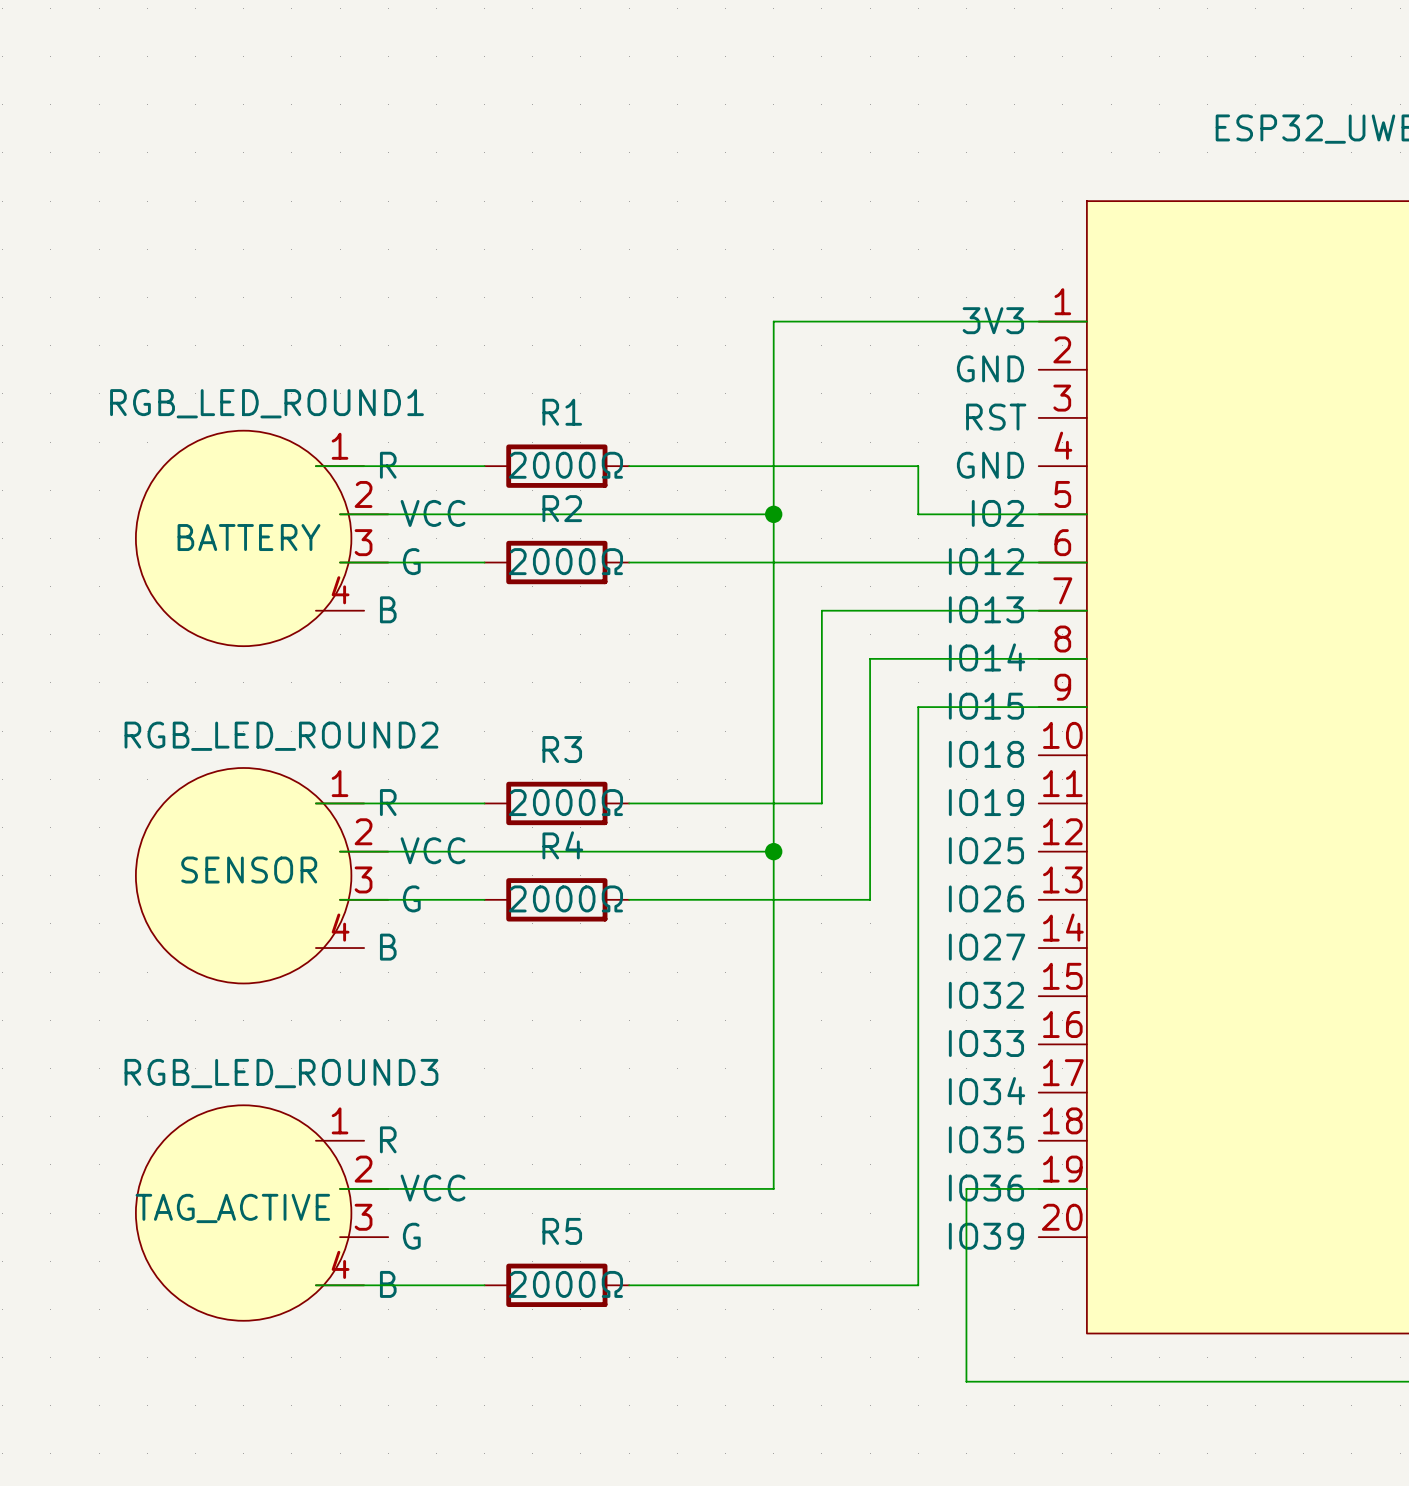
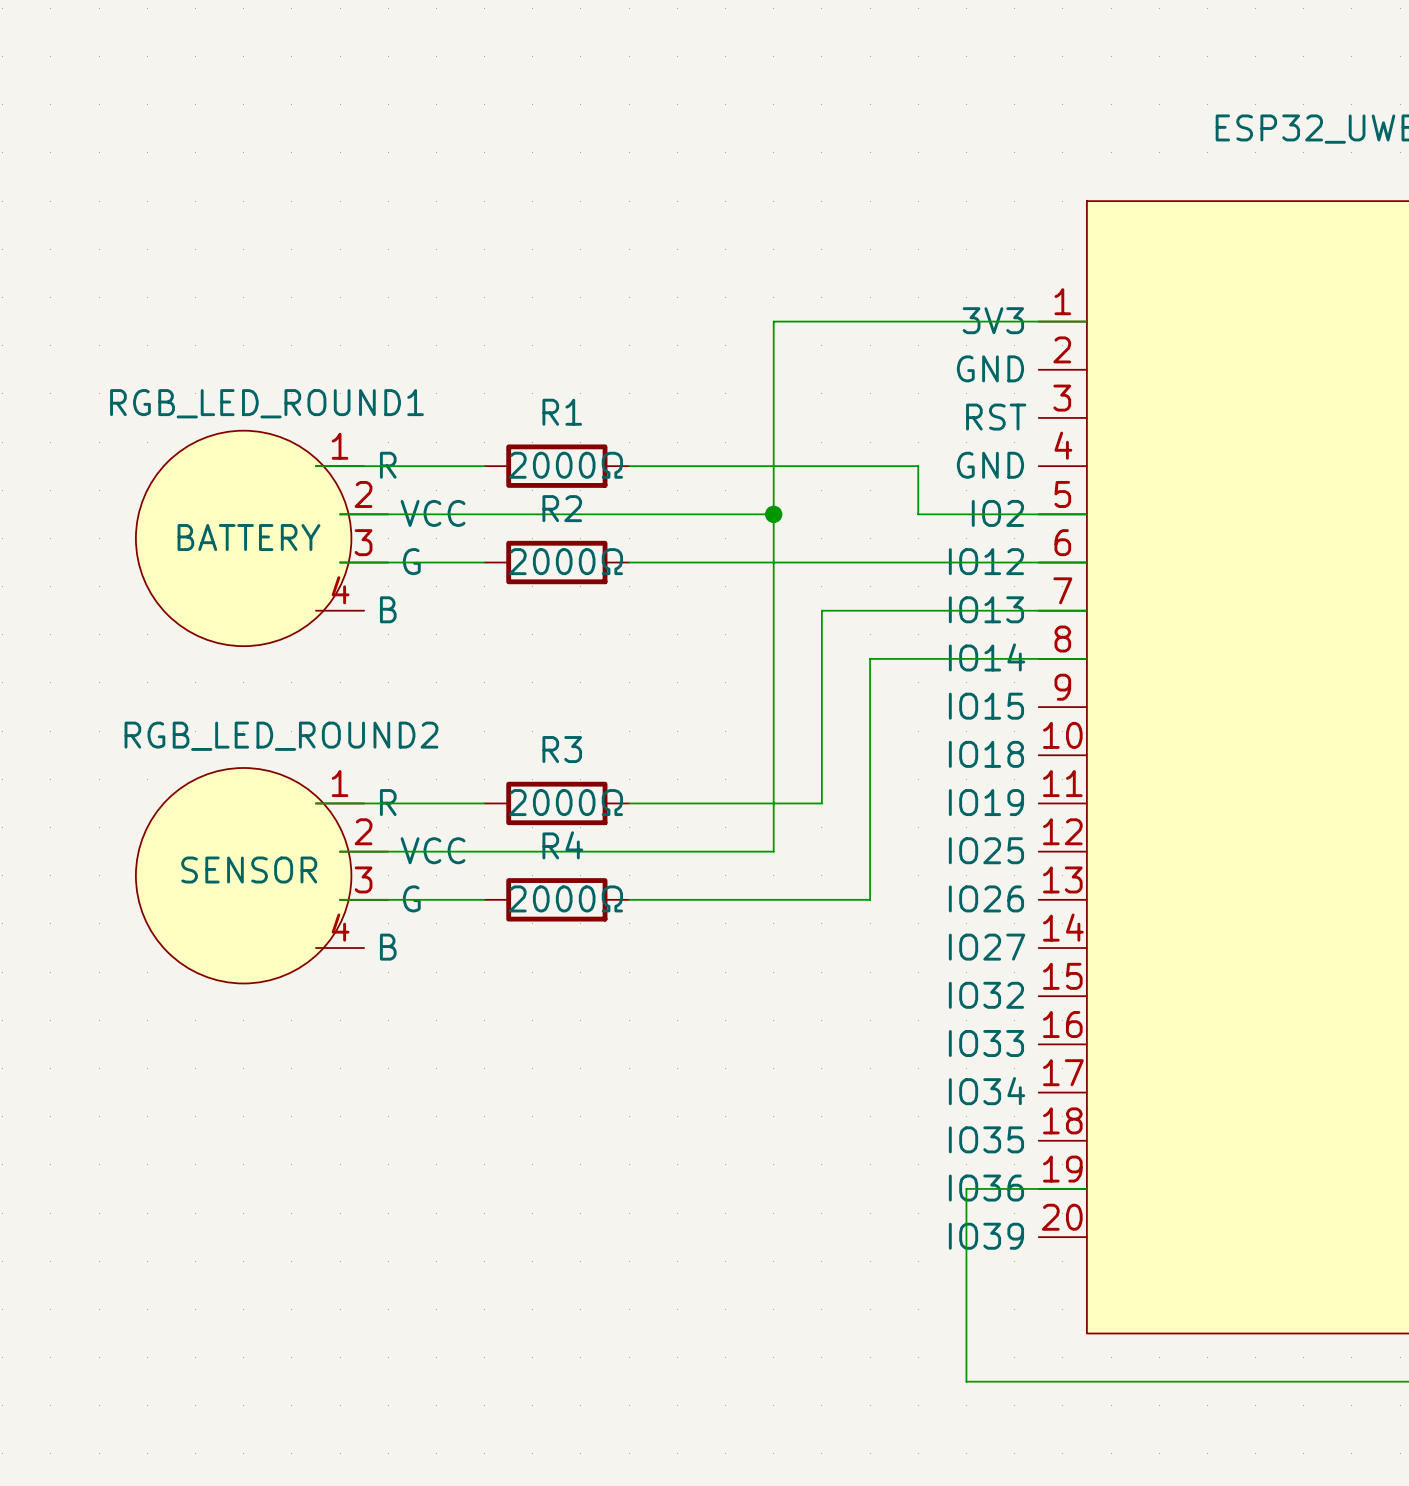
wire: (1086, 707) (918, 707) (918, 1285) (629, 1285) -> none
wire: (773, 851) (773, 1188) (340, 1188) -> none
junction: (773, 851) -> none
RGB_LED_ROUND3: TAG_ACTIVE (262, 1213) -> none
wire: (315, 1285) (484, 1285) -> none
R5: 2000Ω (556, 1285) -> none

